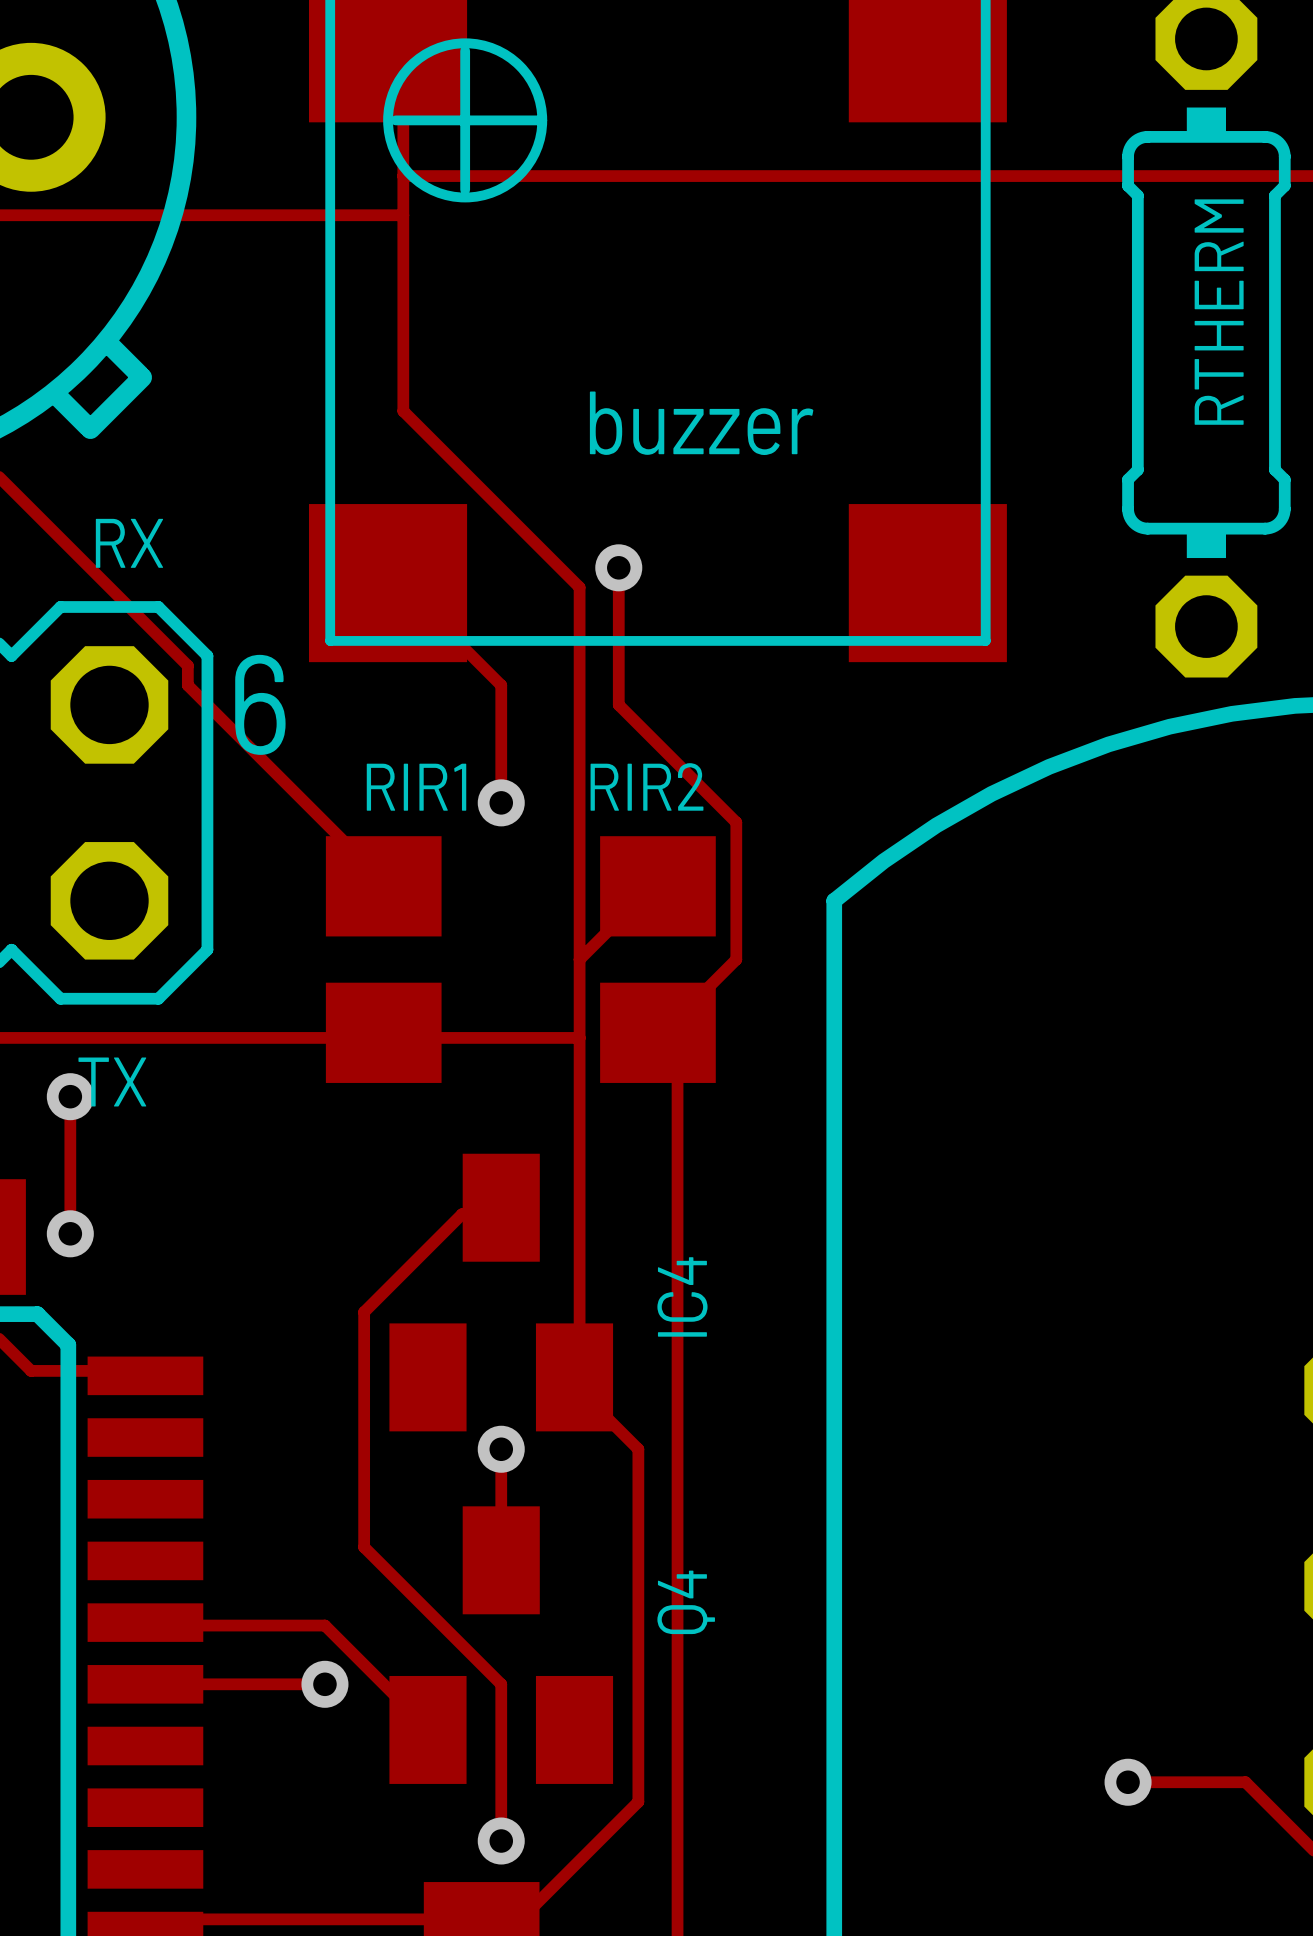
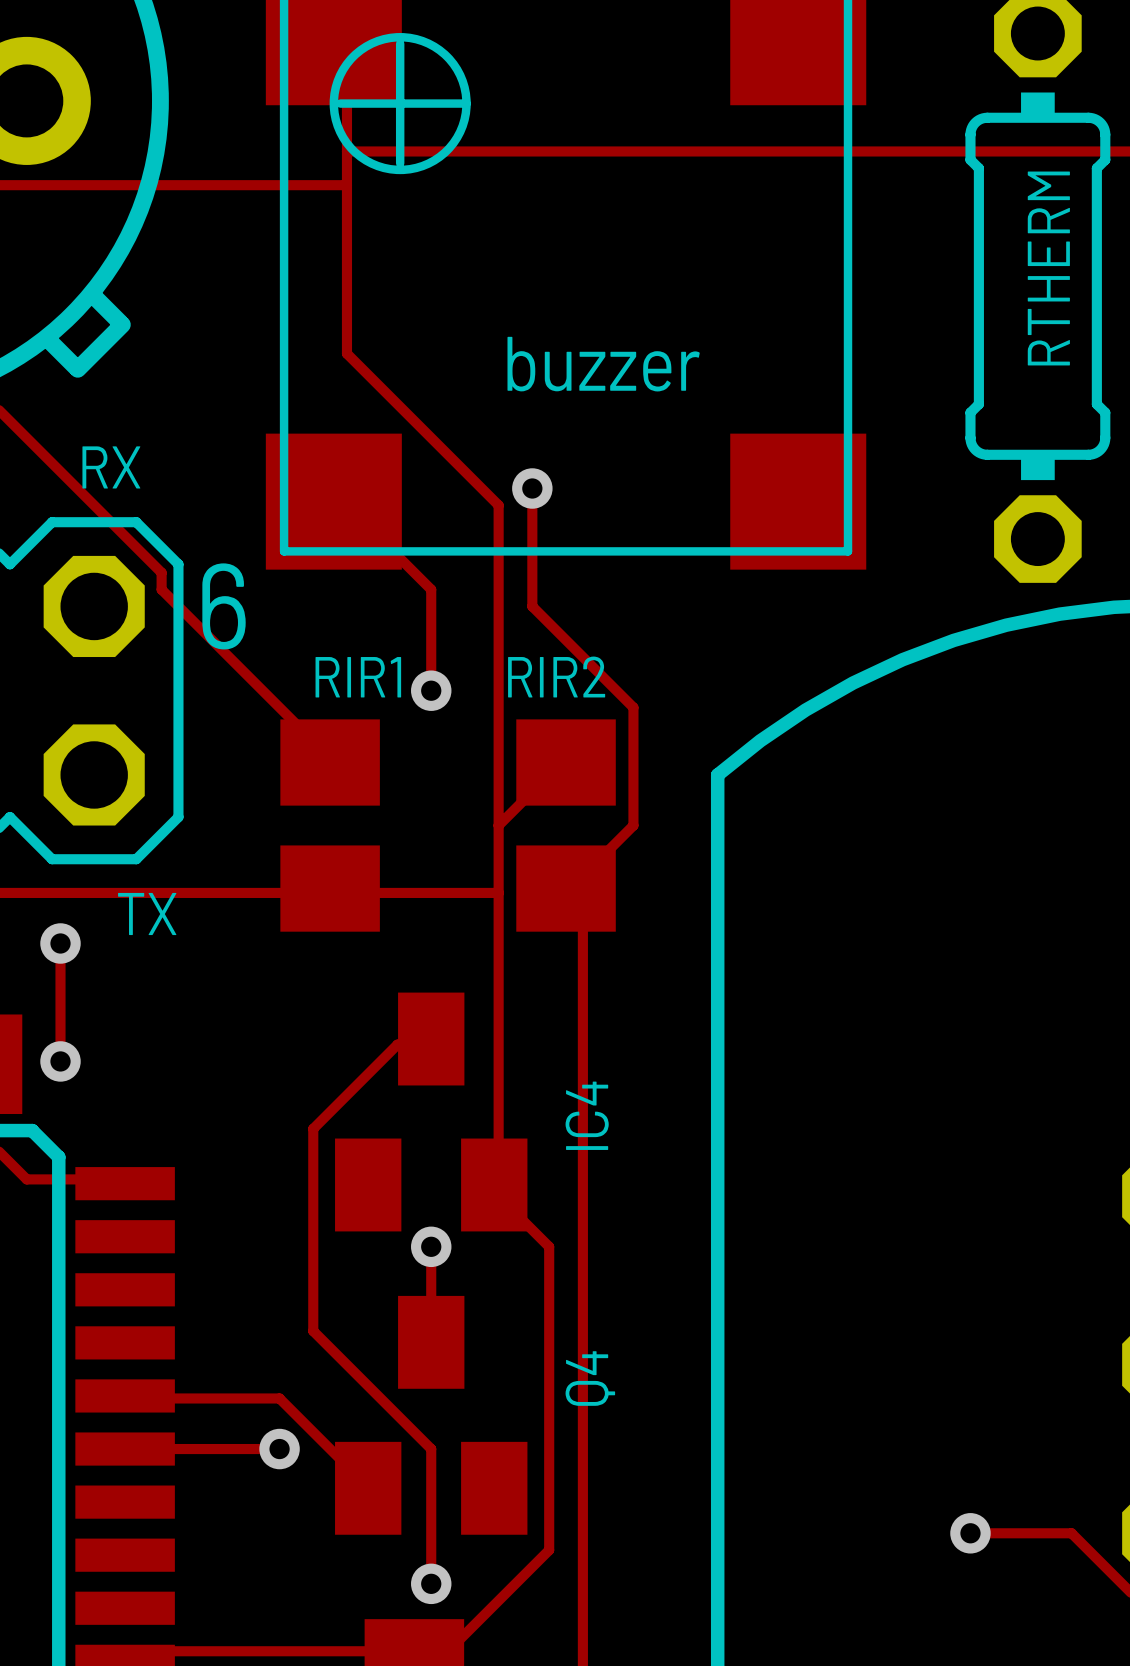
text position: TX (112, 1081) -> TX (147, 914)

